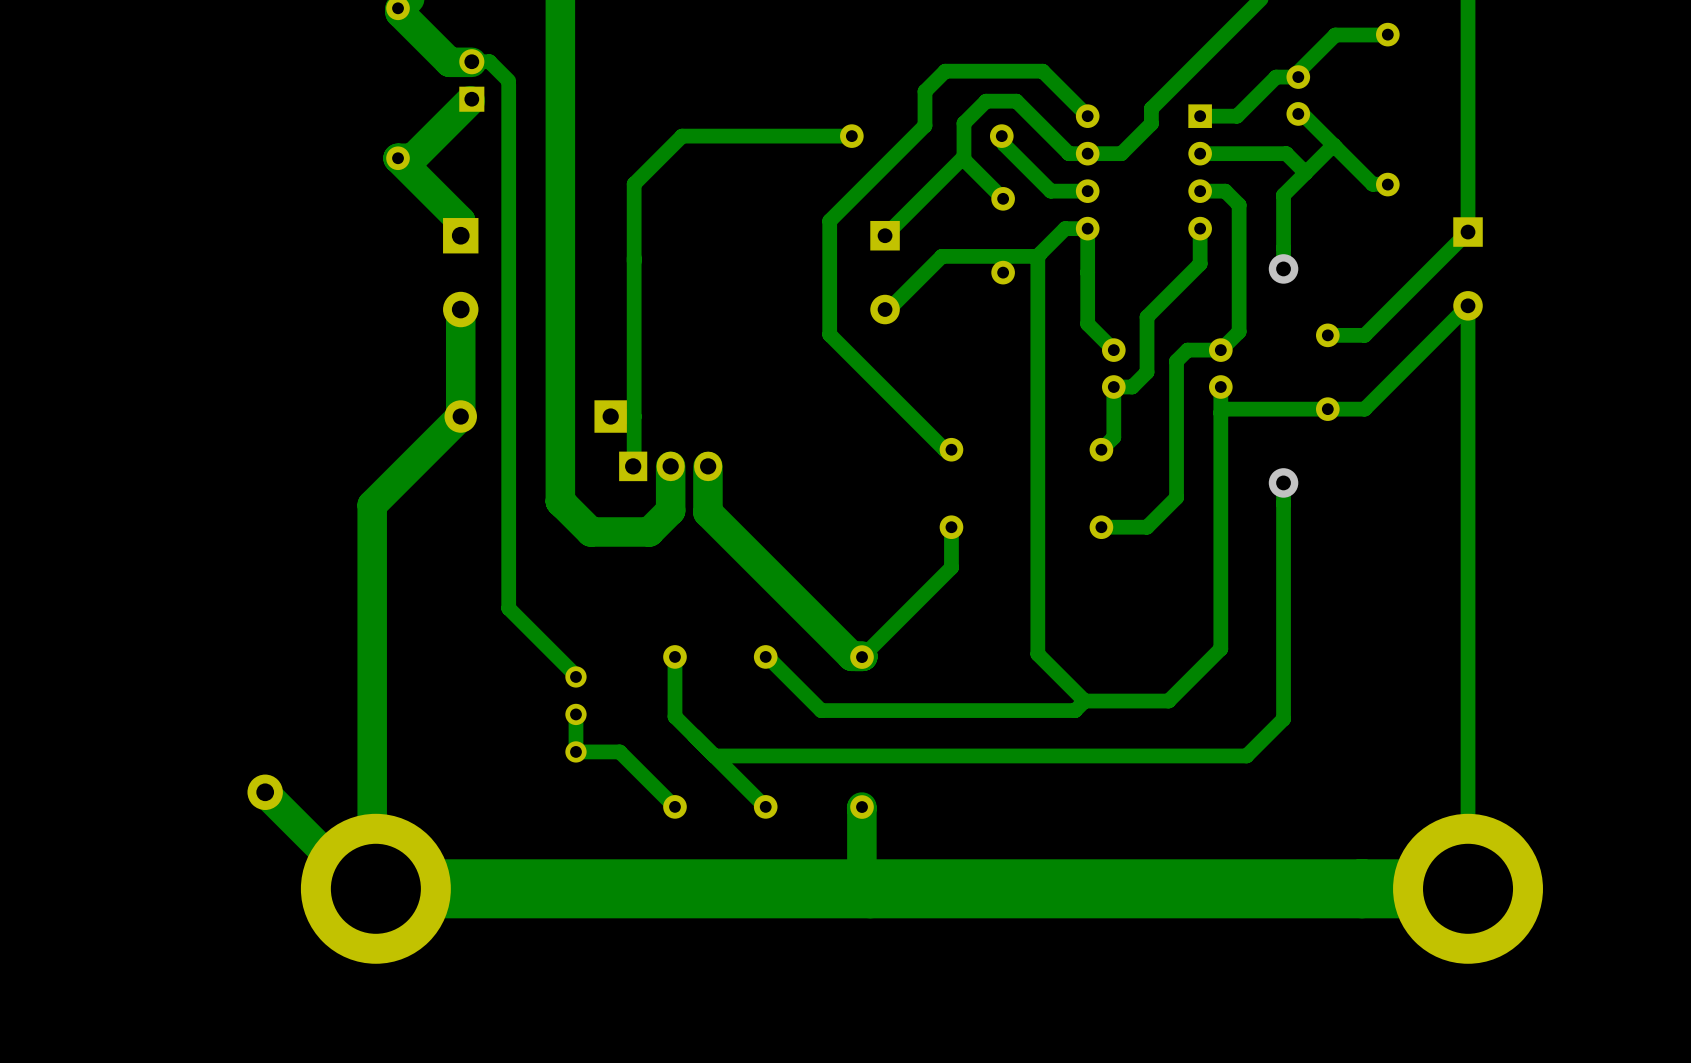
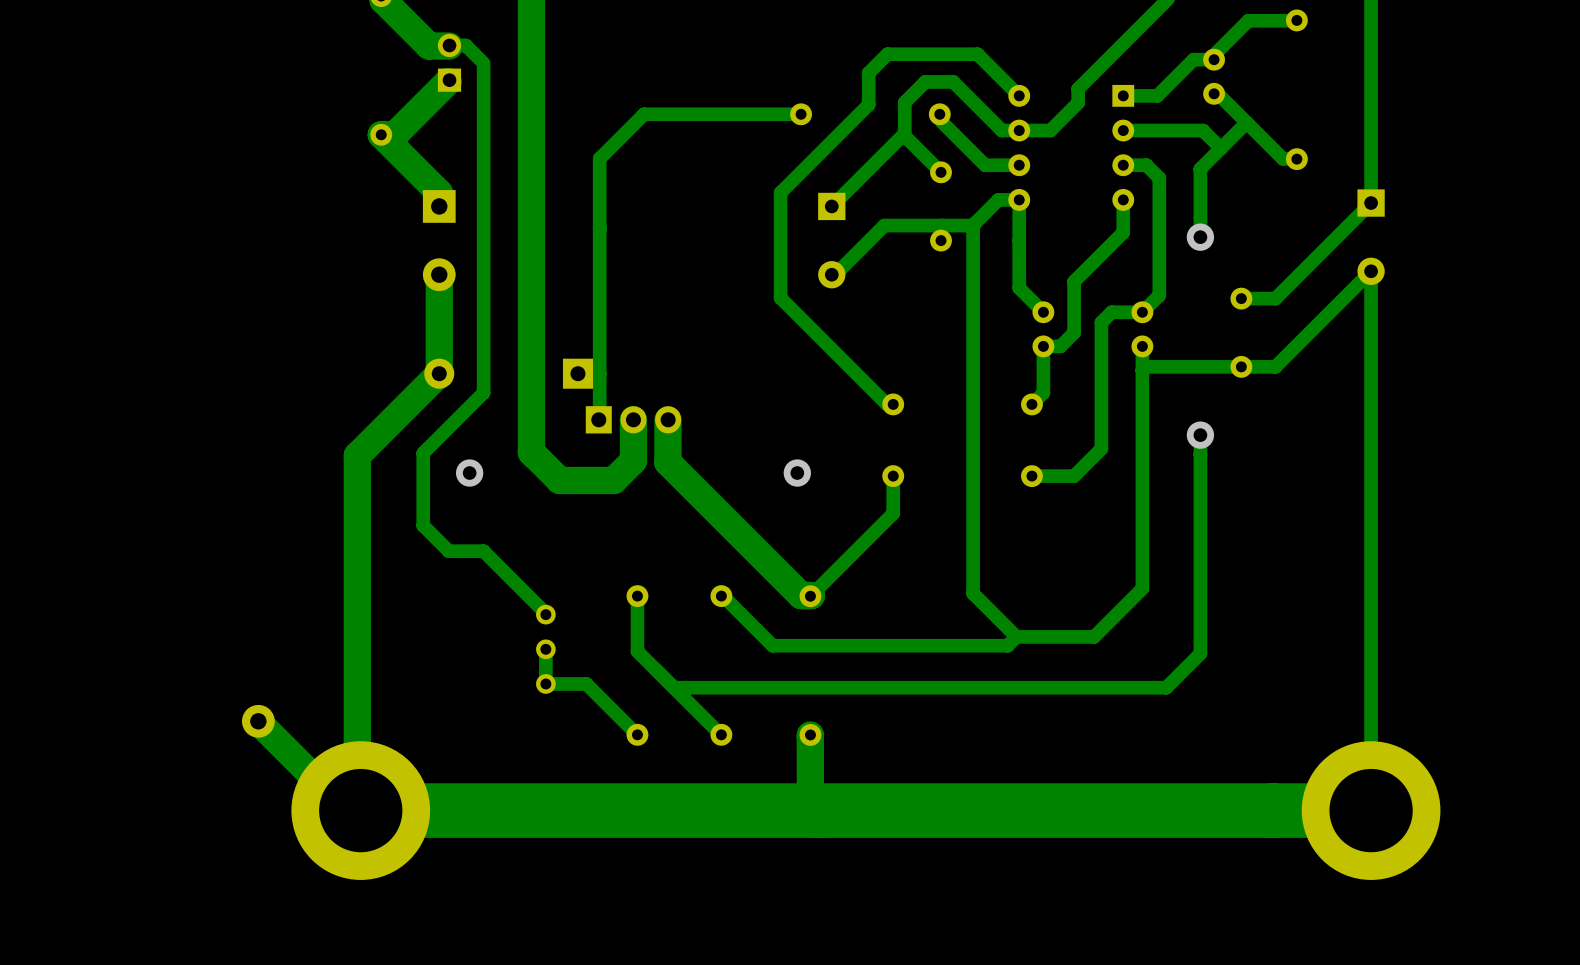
track: (508, 437) (508, 608) -> (483, 392) (423, 453) (423, 525) (448, 551) (483, 551)
via: none -> (469, 473)
via: none -> (797, 473)

